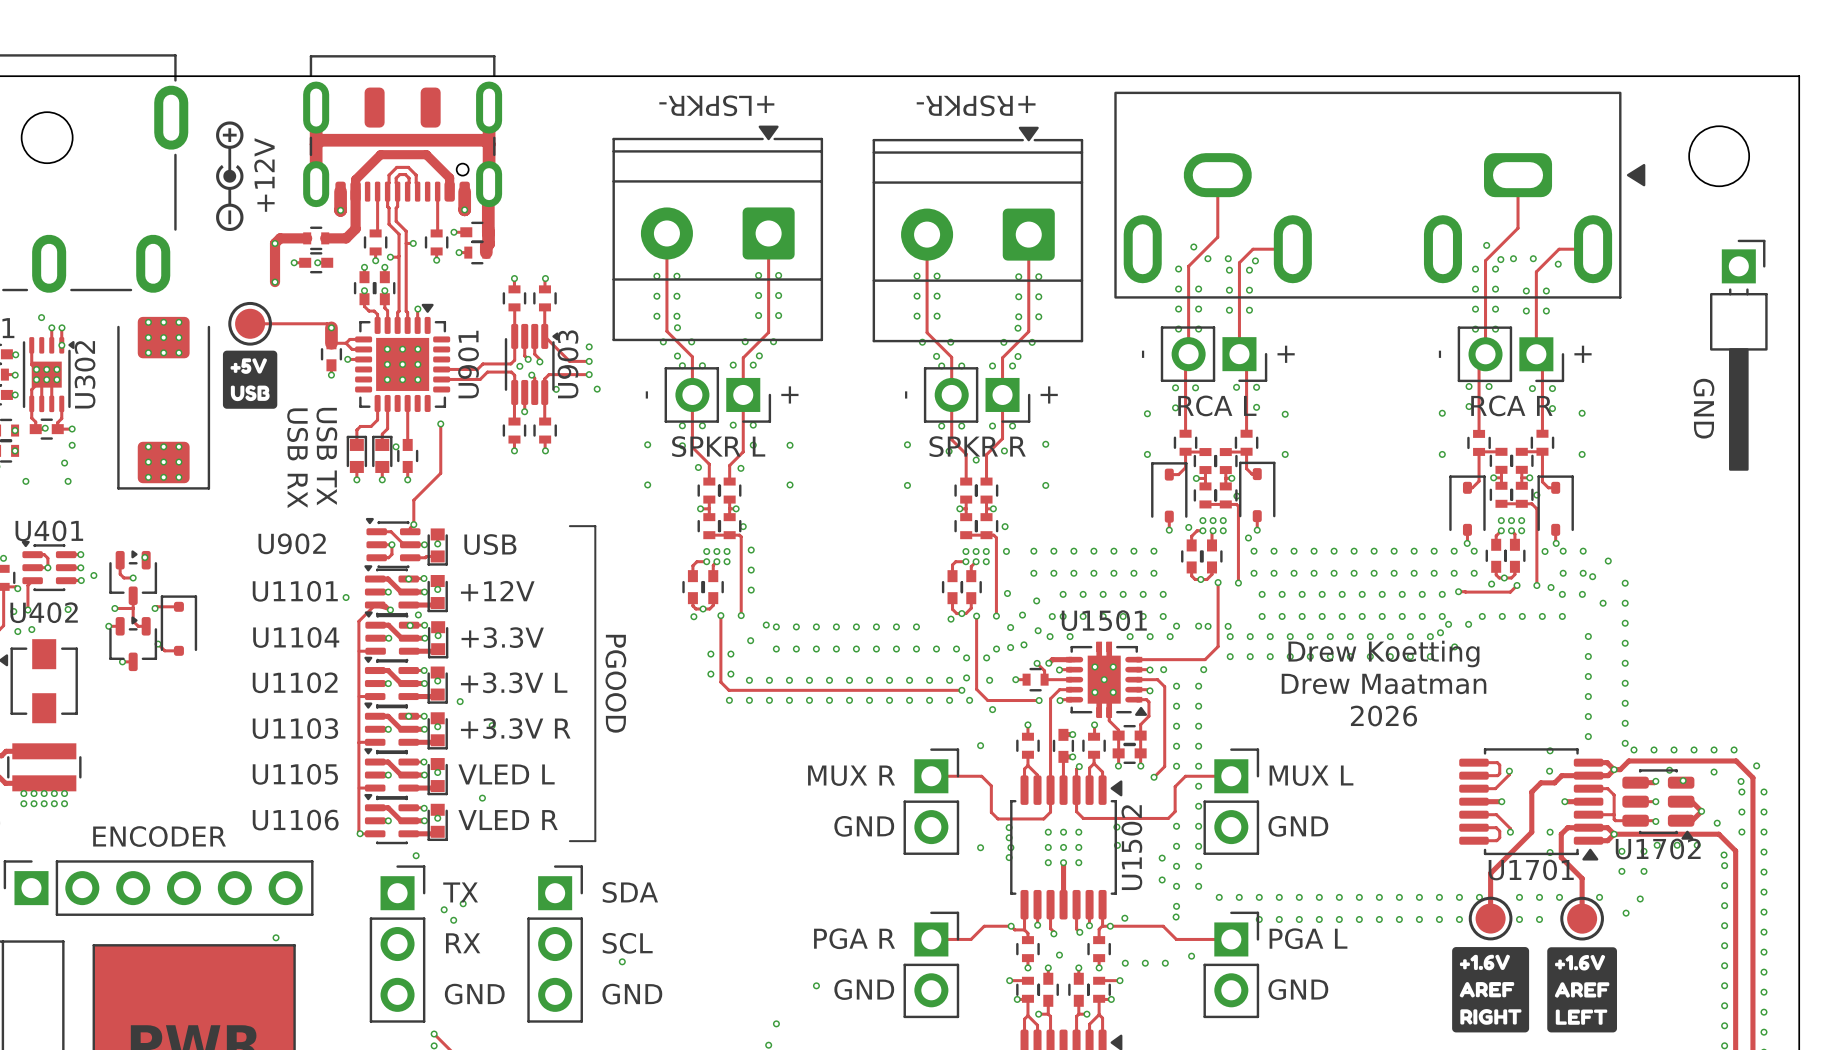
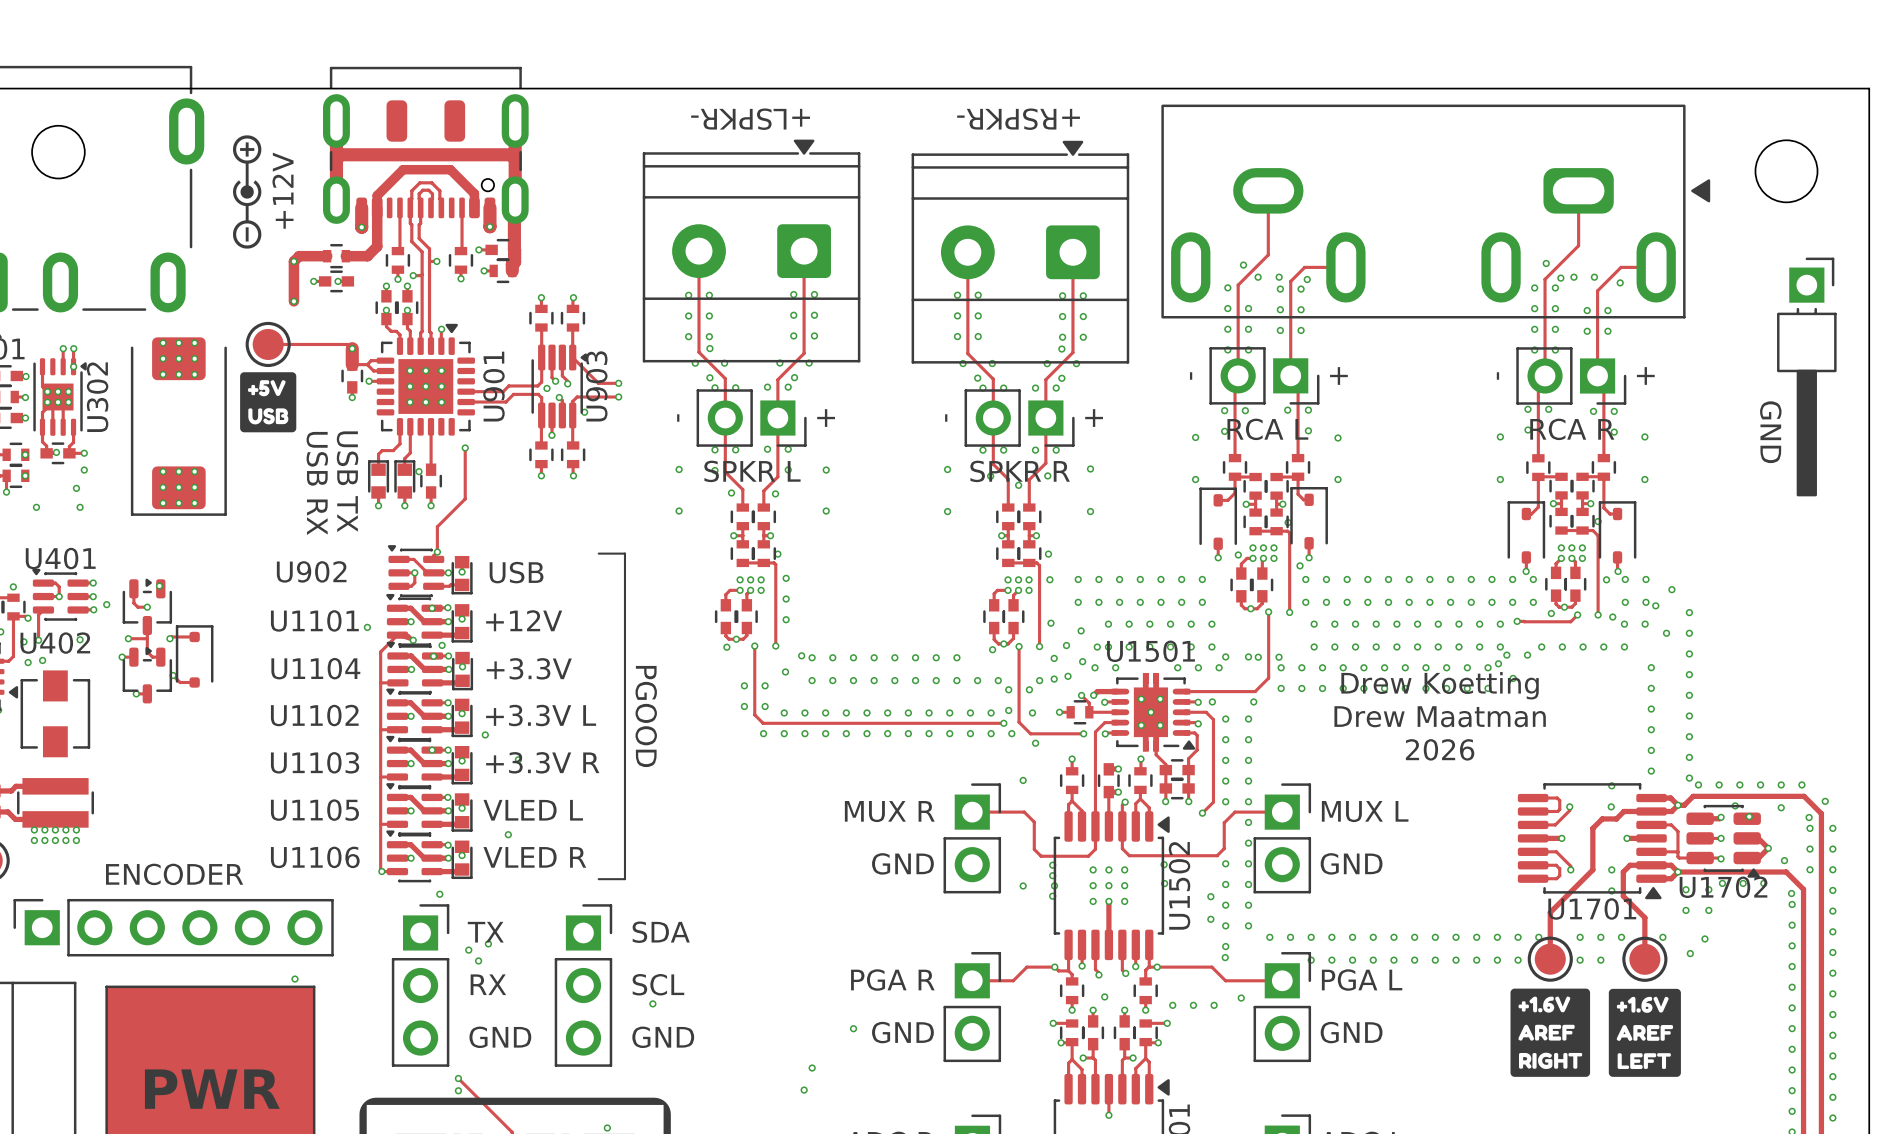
via: (41, 317) -> none
via: (589, 346) -> none
via: (597, 389) -> none
via: (1124, 918) -> none

